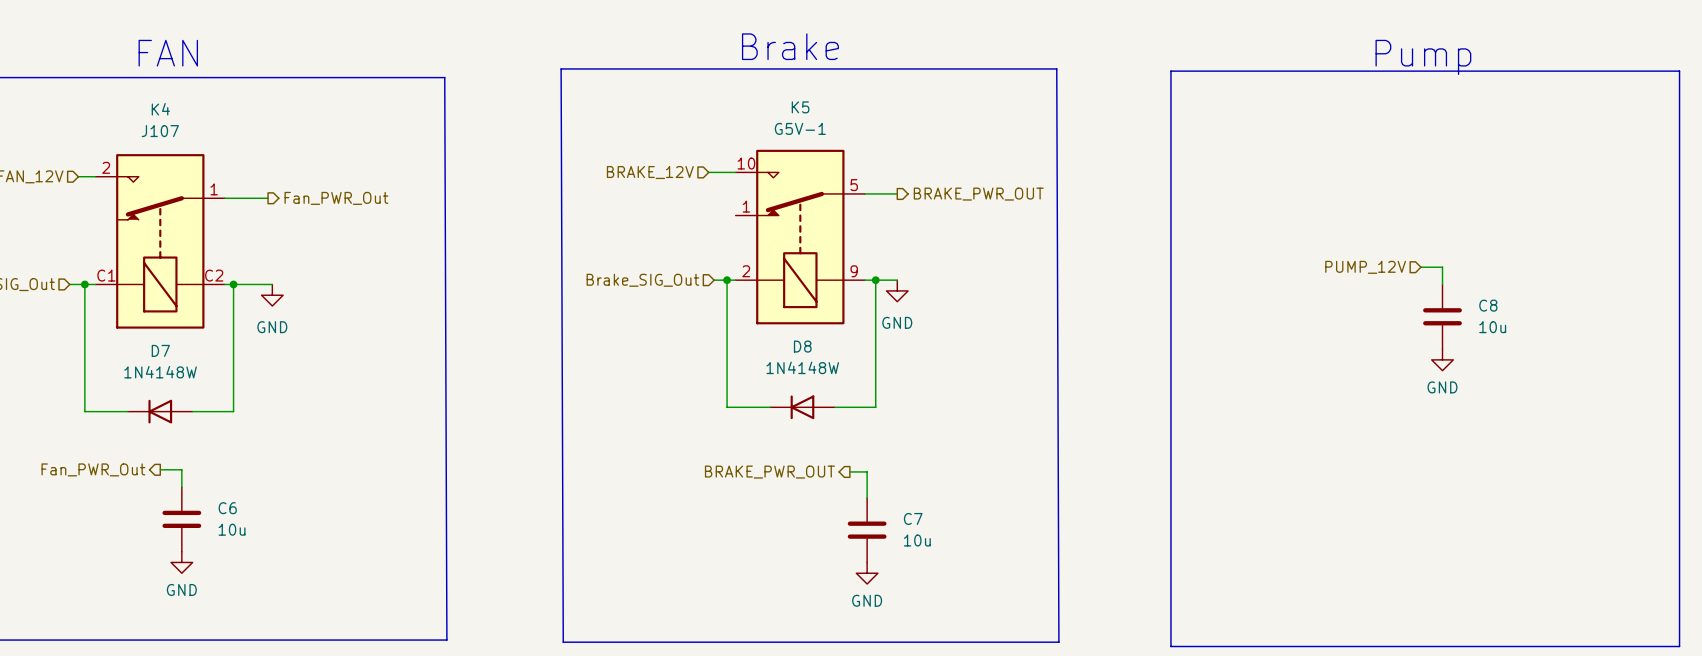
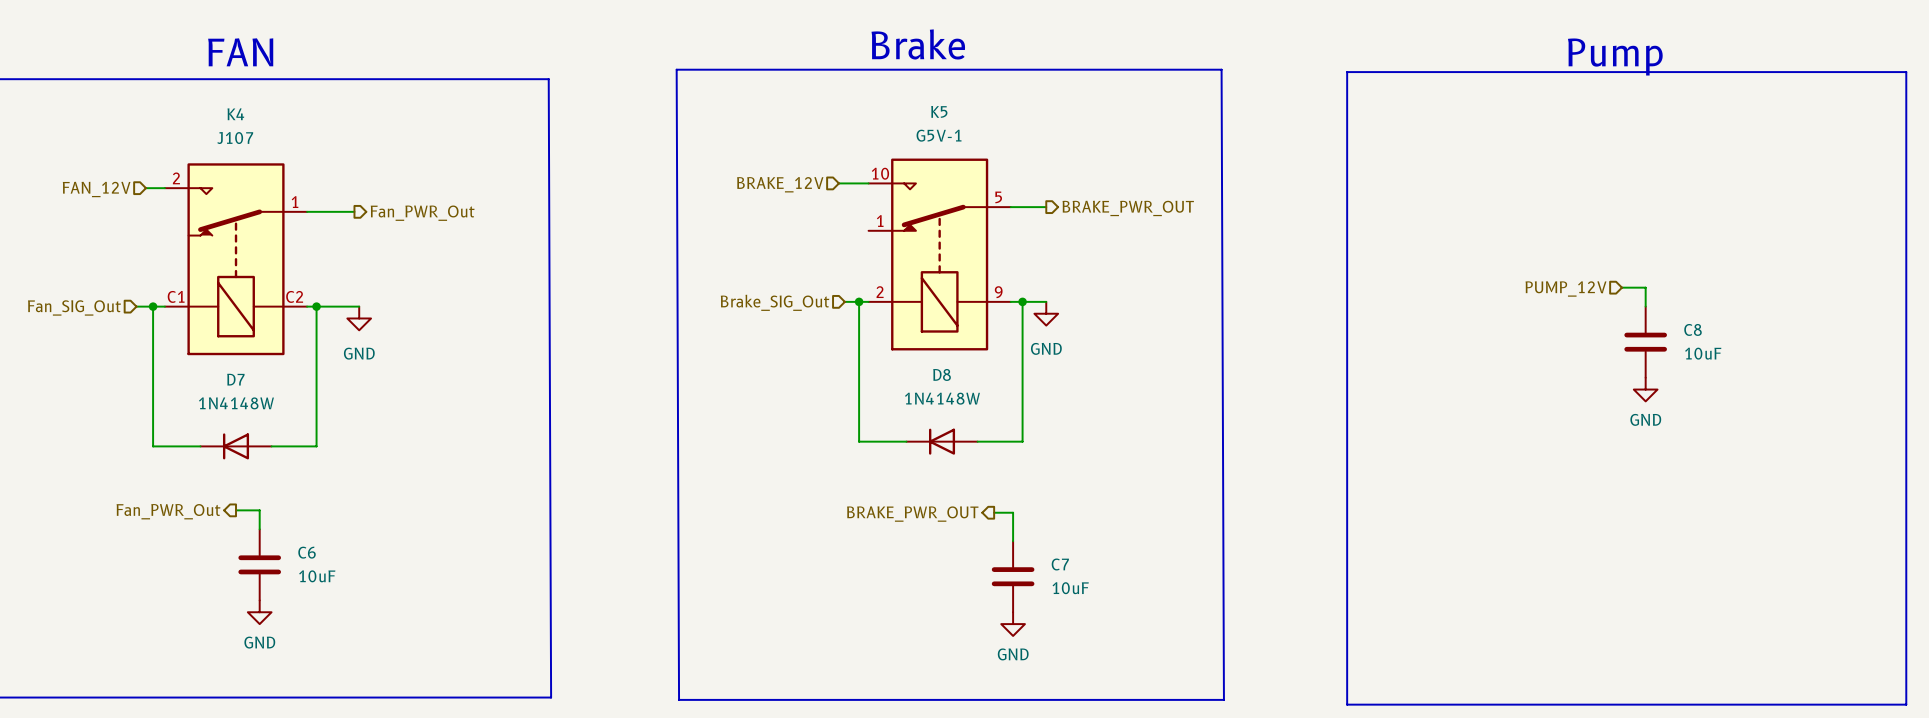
C8 value: 10u (1492, 327) -> 10uF (1703, 353)
C6 value: 10u (232, 529) -> 10uF (317, 576)
C7 value: 10u (917, 540) -> 10uF (1070, 588)

